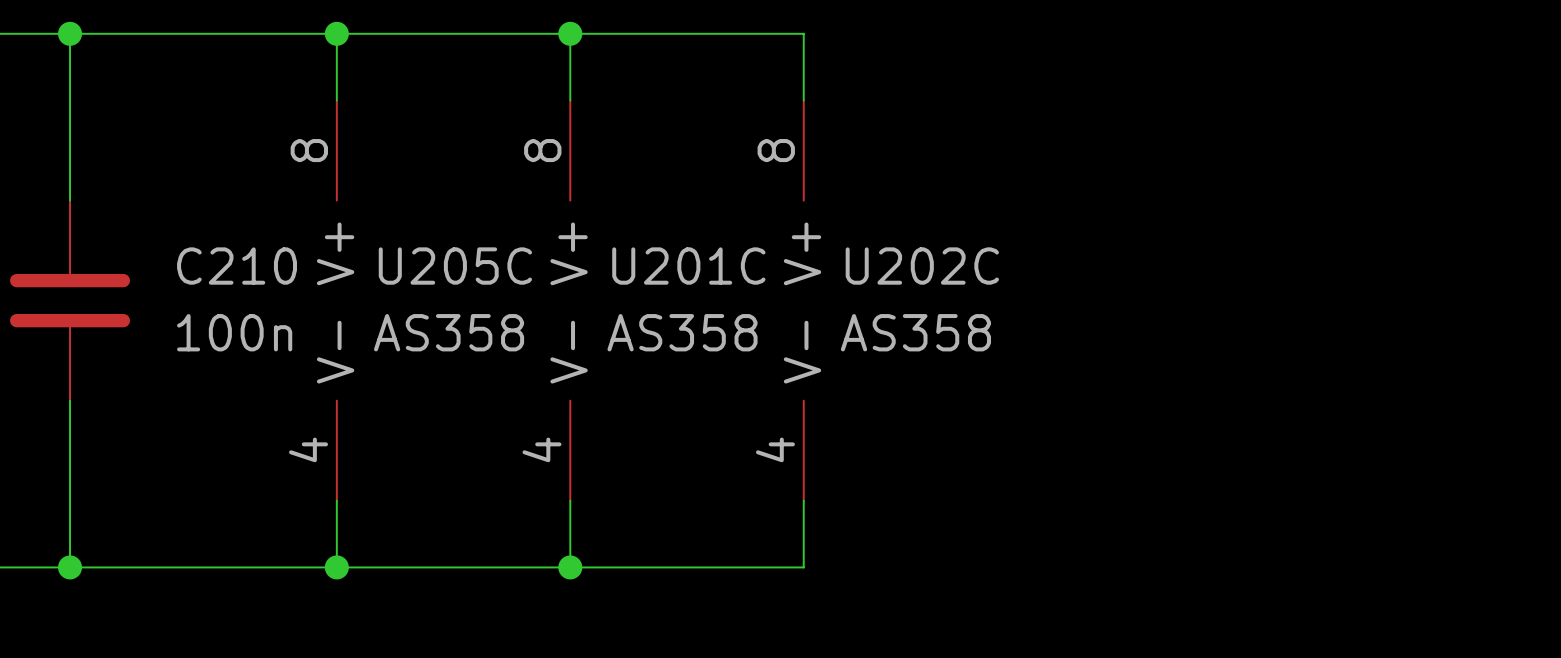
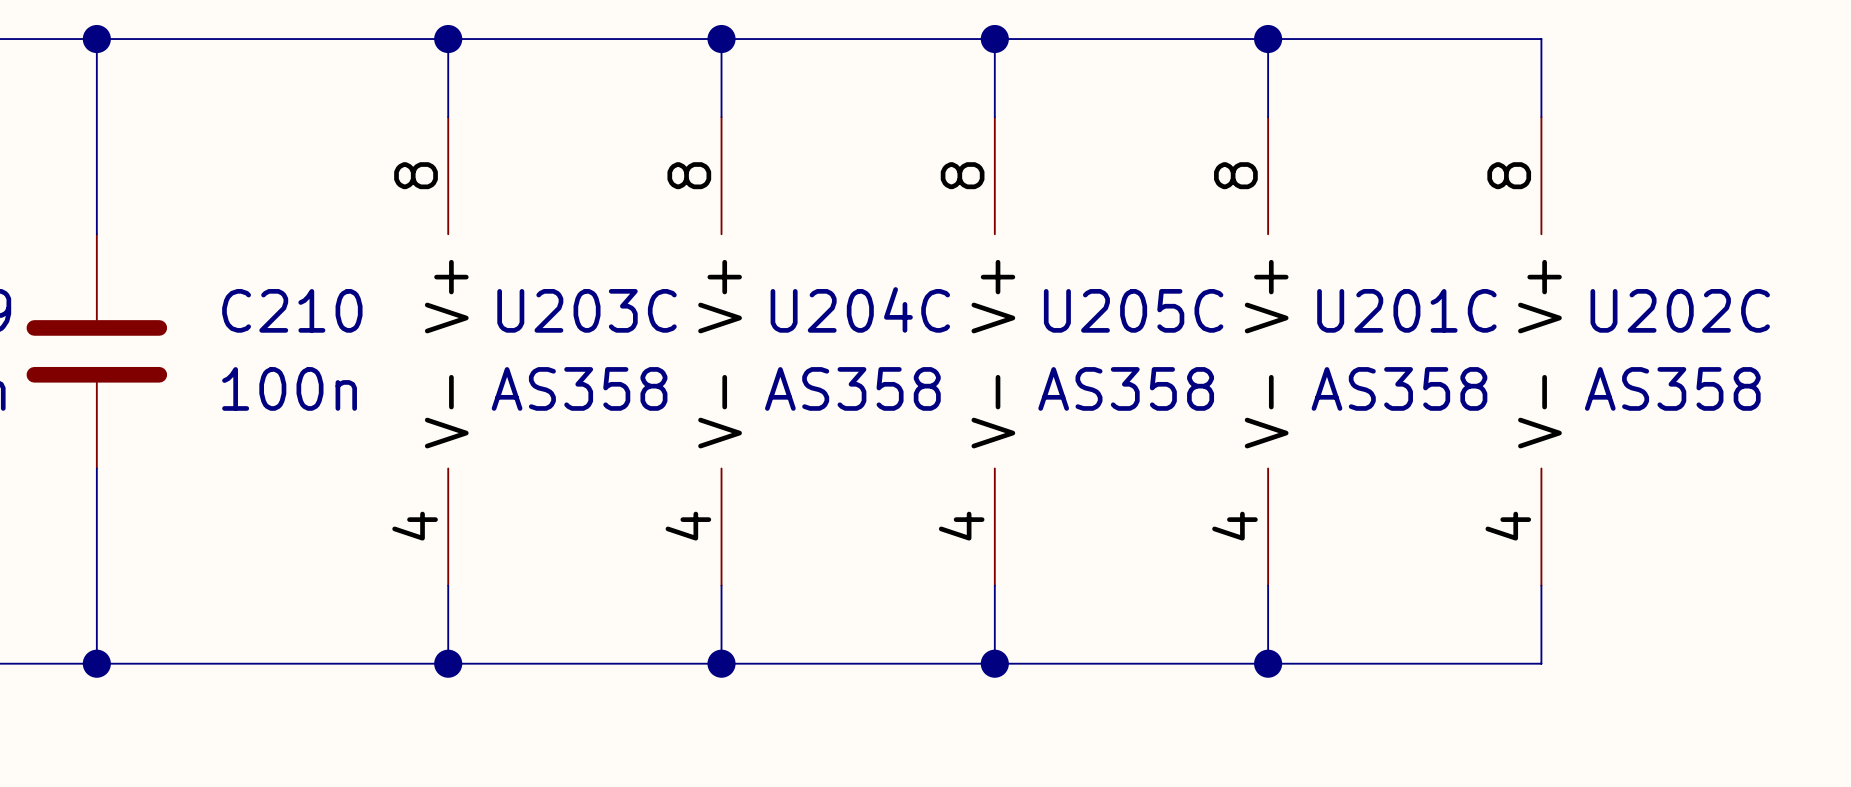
wire: (336, 33) (336, 100) -> (448, 39) (448, 117)
junction position: (336, 33) -> (448, 39)
wire: (570, 33) (570, 100) -> (721, 39) (721, 117)
junction position: (570, 33) -> (721, 39)
wire: (803, 33) (803, 100) -> (955, 39) (1541, 39) (1541, 117)
wire: none -> (994, 39) (994, 117)
junction: none -> (994, 39)
wire: none -> (1268, 39) (1268, 117)
junction: none -> (1268, 39)
U205C position: (336, 300) -> (994, 351)
U203C: none -> AS358 (448, 351)
U201C position: (570, 300) -> (1268, 351)
U204C: none -> AS358 (721, 351)
U202C position: (803, 300) -> (1541, 351)
wire: (336, 500) (336, 567) -> (448, 585) (448, 663)
wire: (570, 500) (570, 567) -> (721, 585) (721, 663)
wire: (803, 500) (803, 567) -> (1541, 585) (1541, 663) (955, 663)
wire: none -> (994, 585) (994, 663)
wire: none -> (1268, 585) (1268, 663)
junction position: (336, 567) -> (448, 663)
junction position: (570, 567) -> (721, 663)
junction: none -> (994, 663)
junction: none -> (1268, 663)

